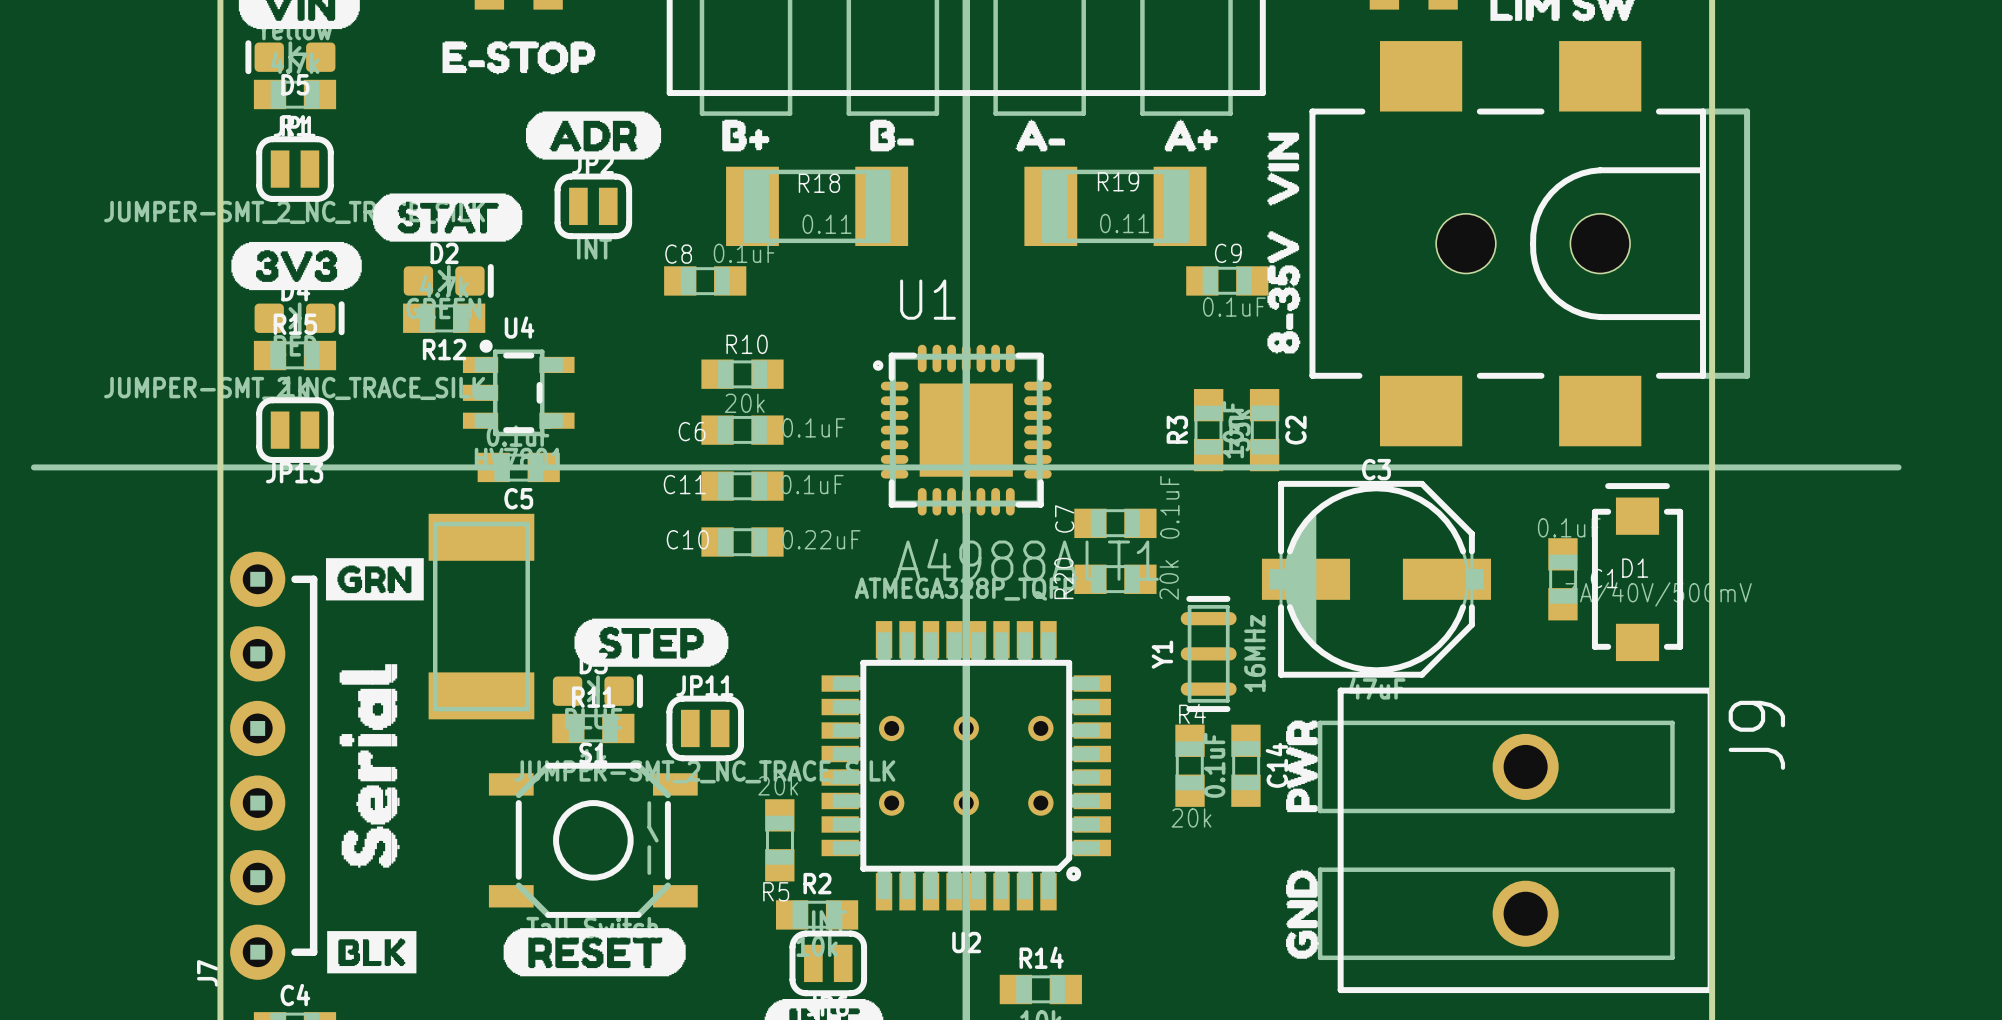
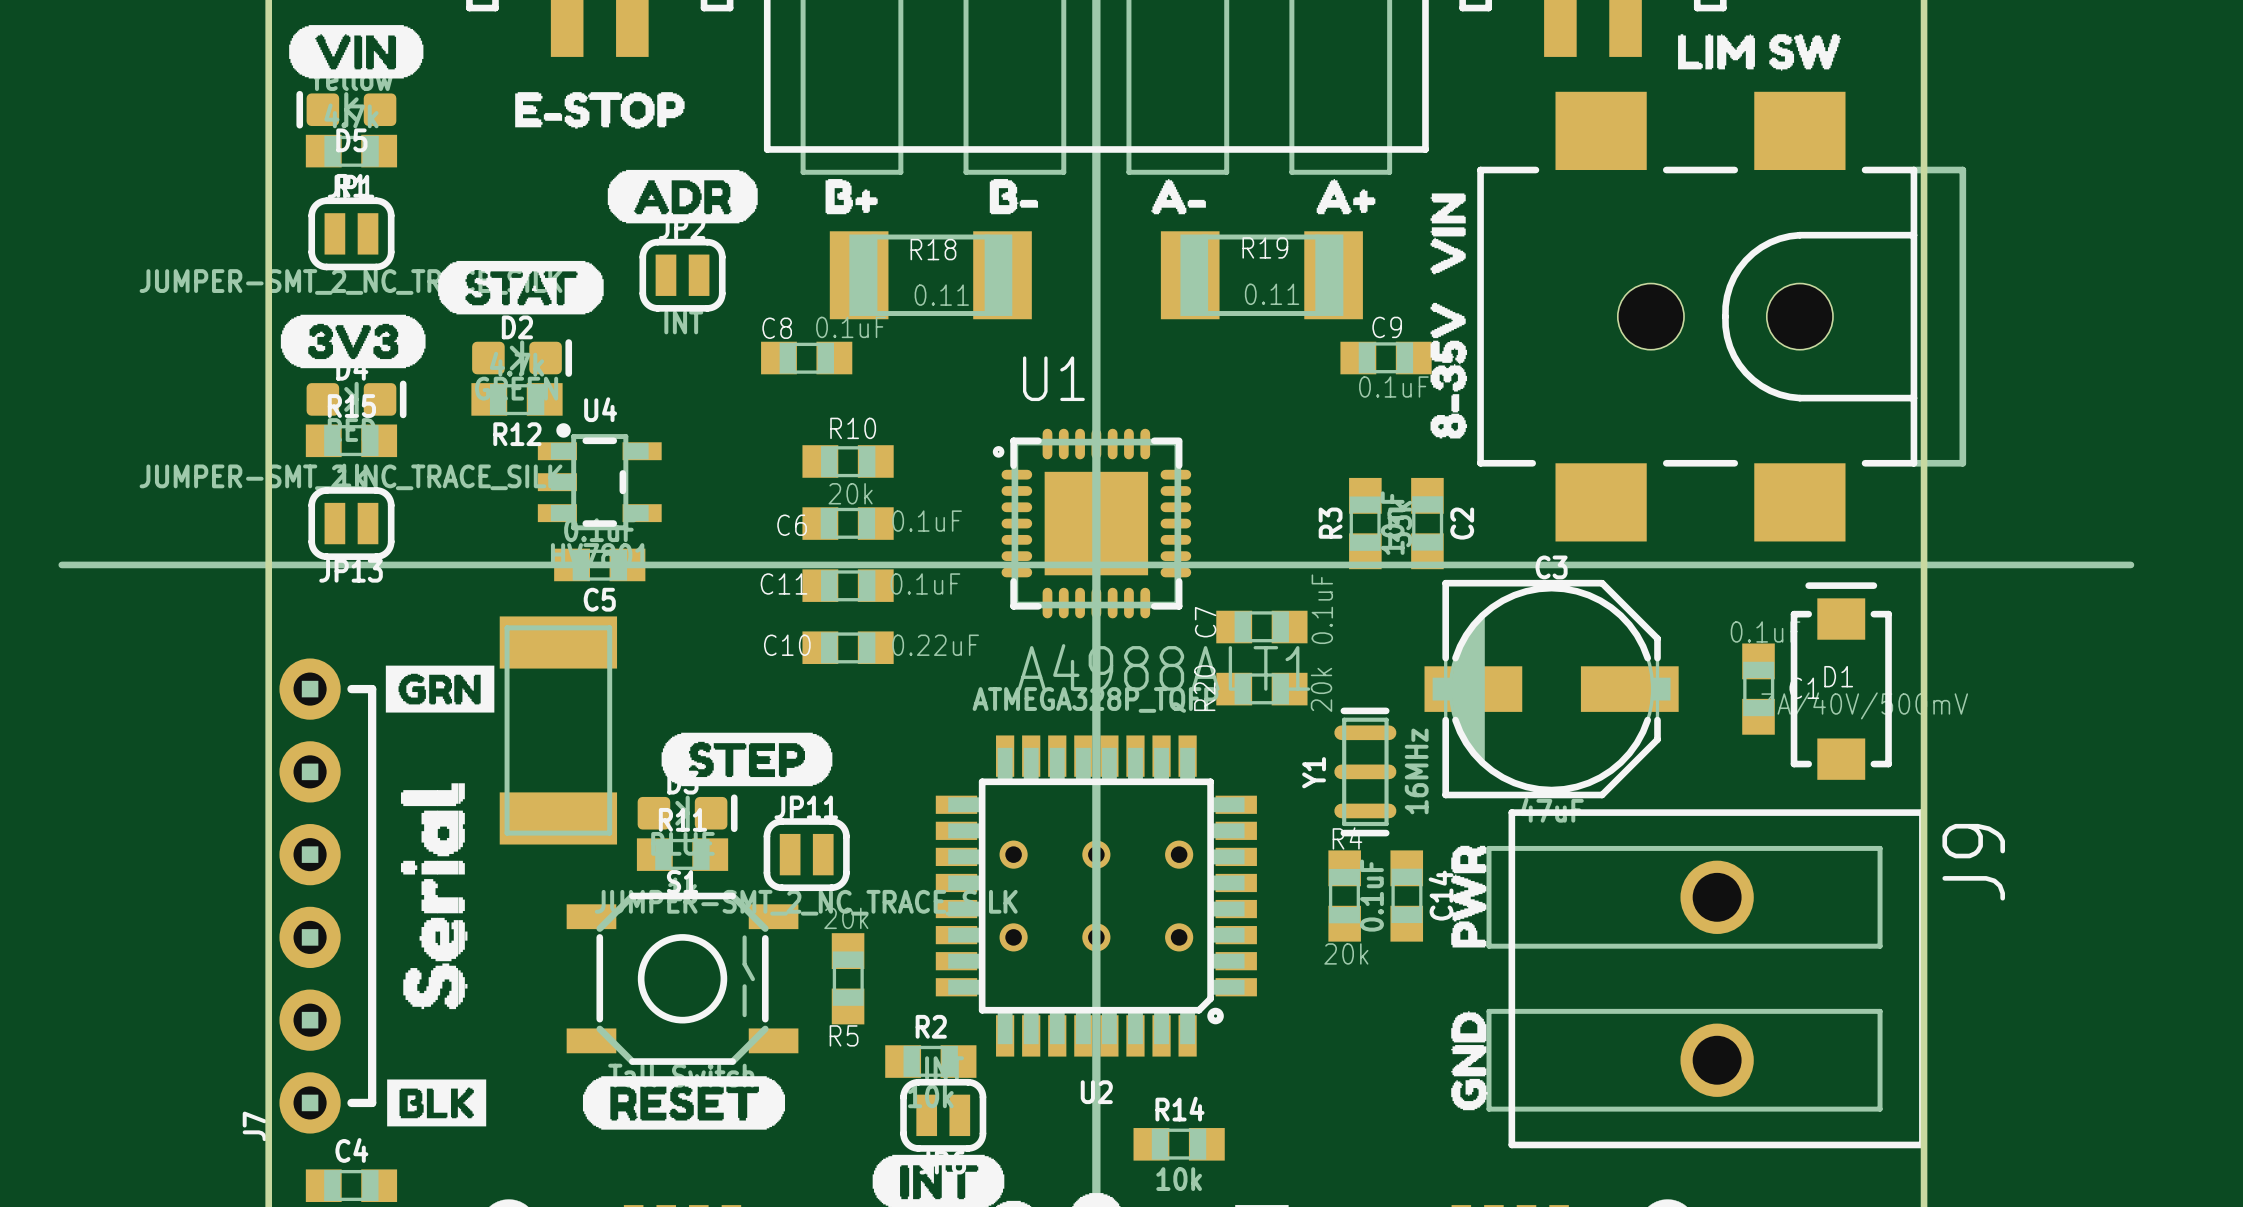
R5 position: (779, 840) -> (848, 978)

